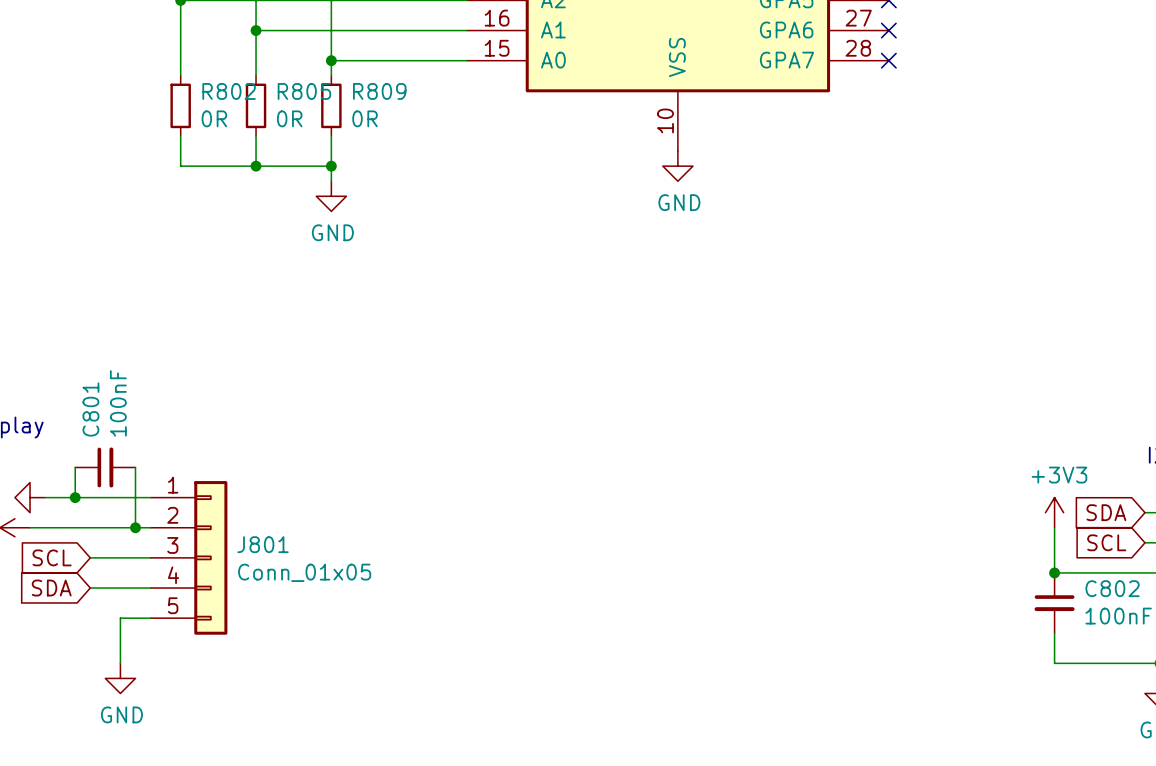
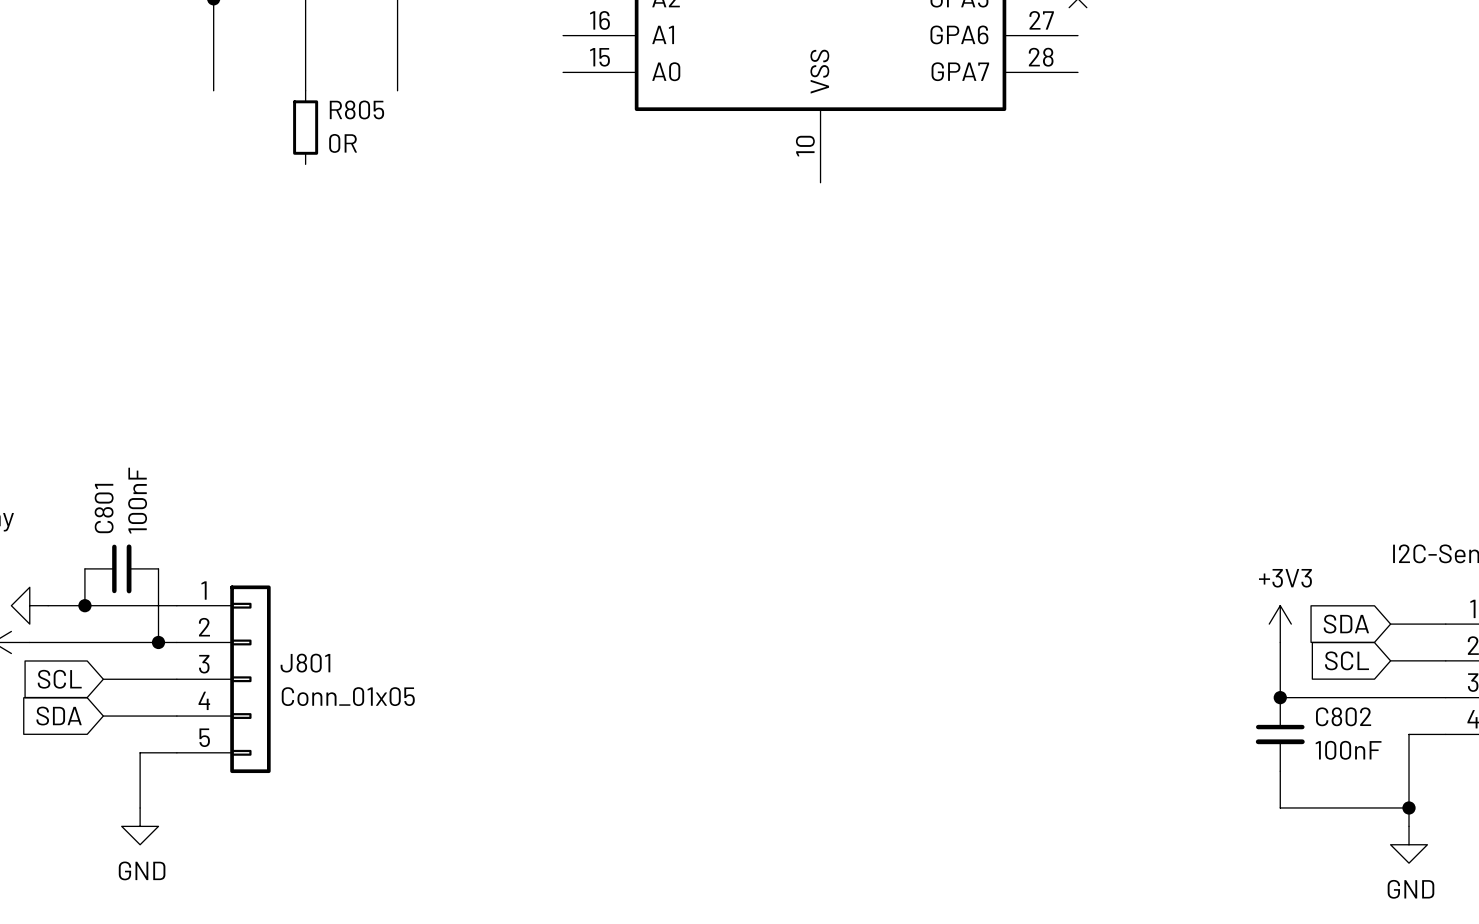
wire: (256, 30) (466, 30) -> none
junction: (256, 30) -> none
no-connect mark: (888, 30) -> none
wire: (331, 60) (466, 60) -> none
junction: (331, 60) -> none
no-connect mark: (888, 60) -> none
R802: 0R (180, 105) -> none
R809: 0R (331, 105) -> none
wire: (180, 136) (180, 166) (331, 166) -> none
wire: (256, 136) (256, 166) -> none
wire: (331, 136) (331, 181) -> none
junction: (256, 166) -> none
junction: (331, 166) -> none
power symbol: GND (677, 166) -> none
power symbol: GND (331, 196) -> none

